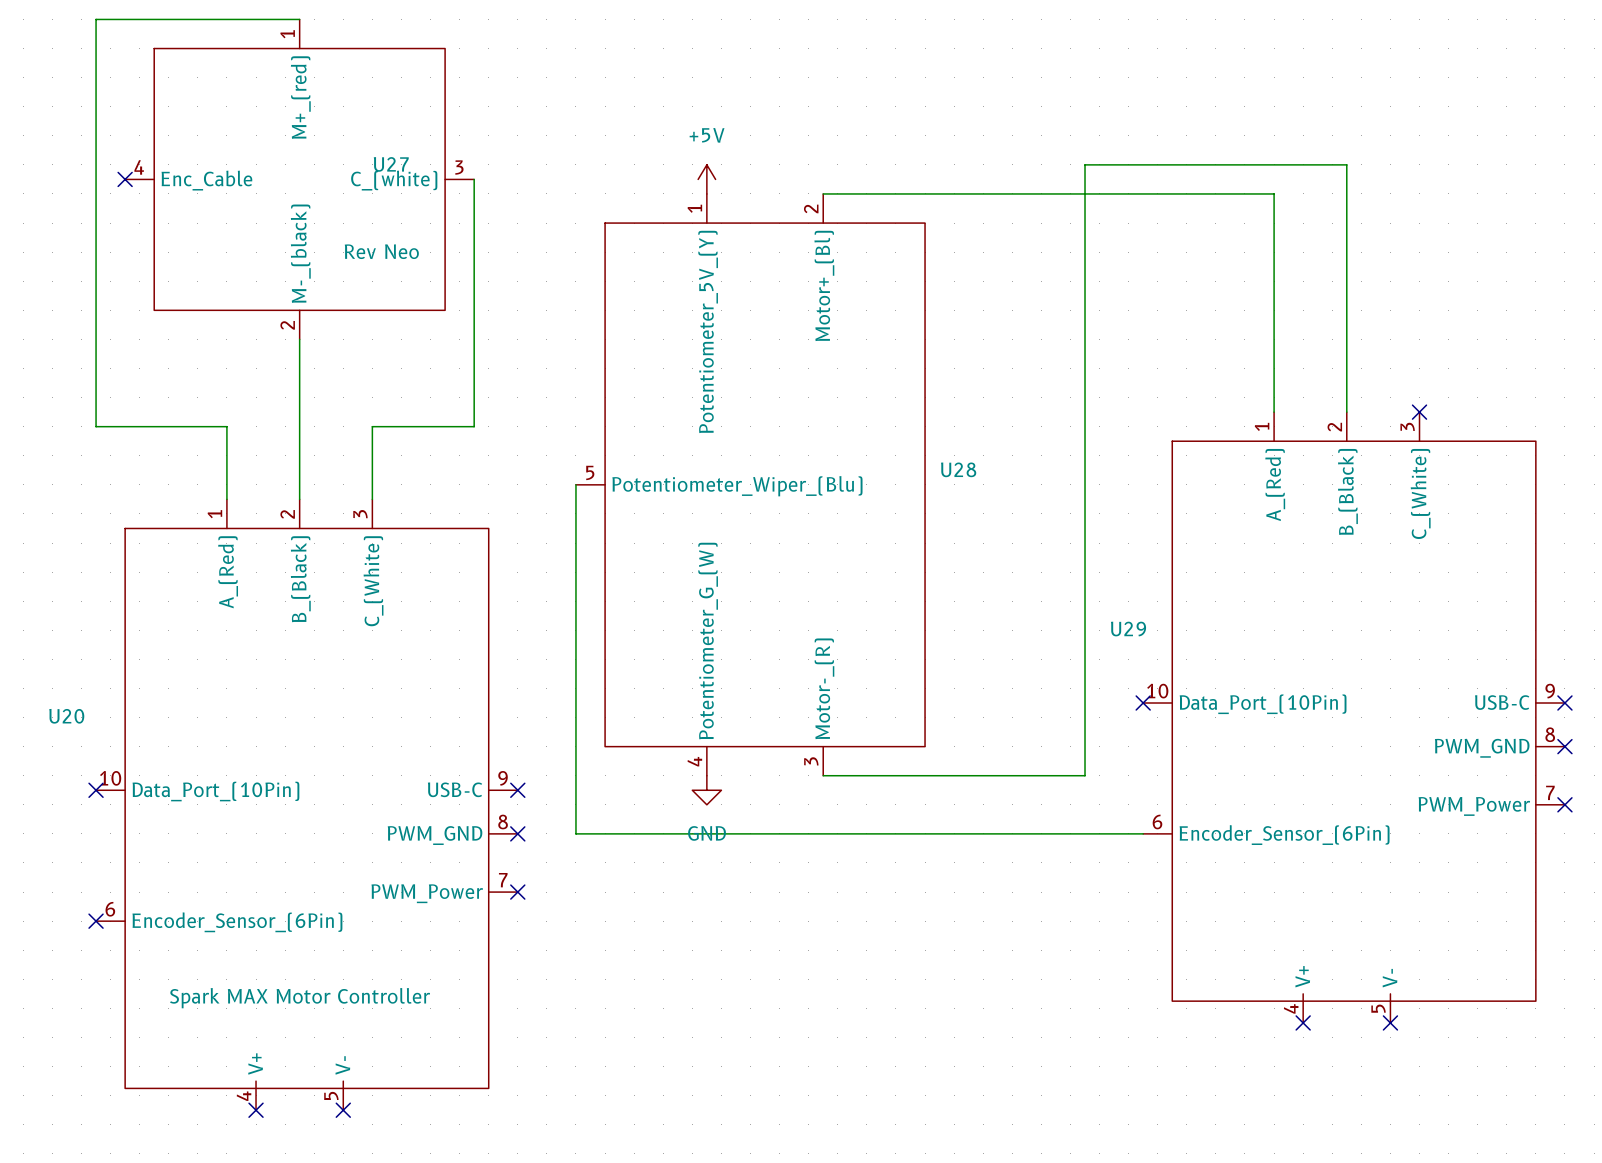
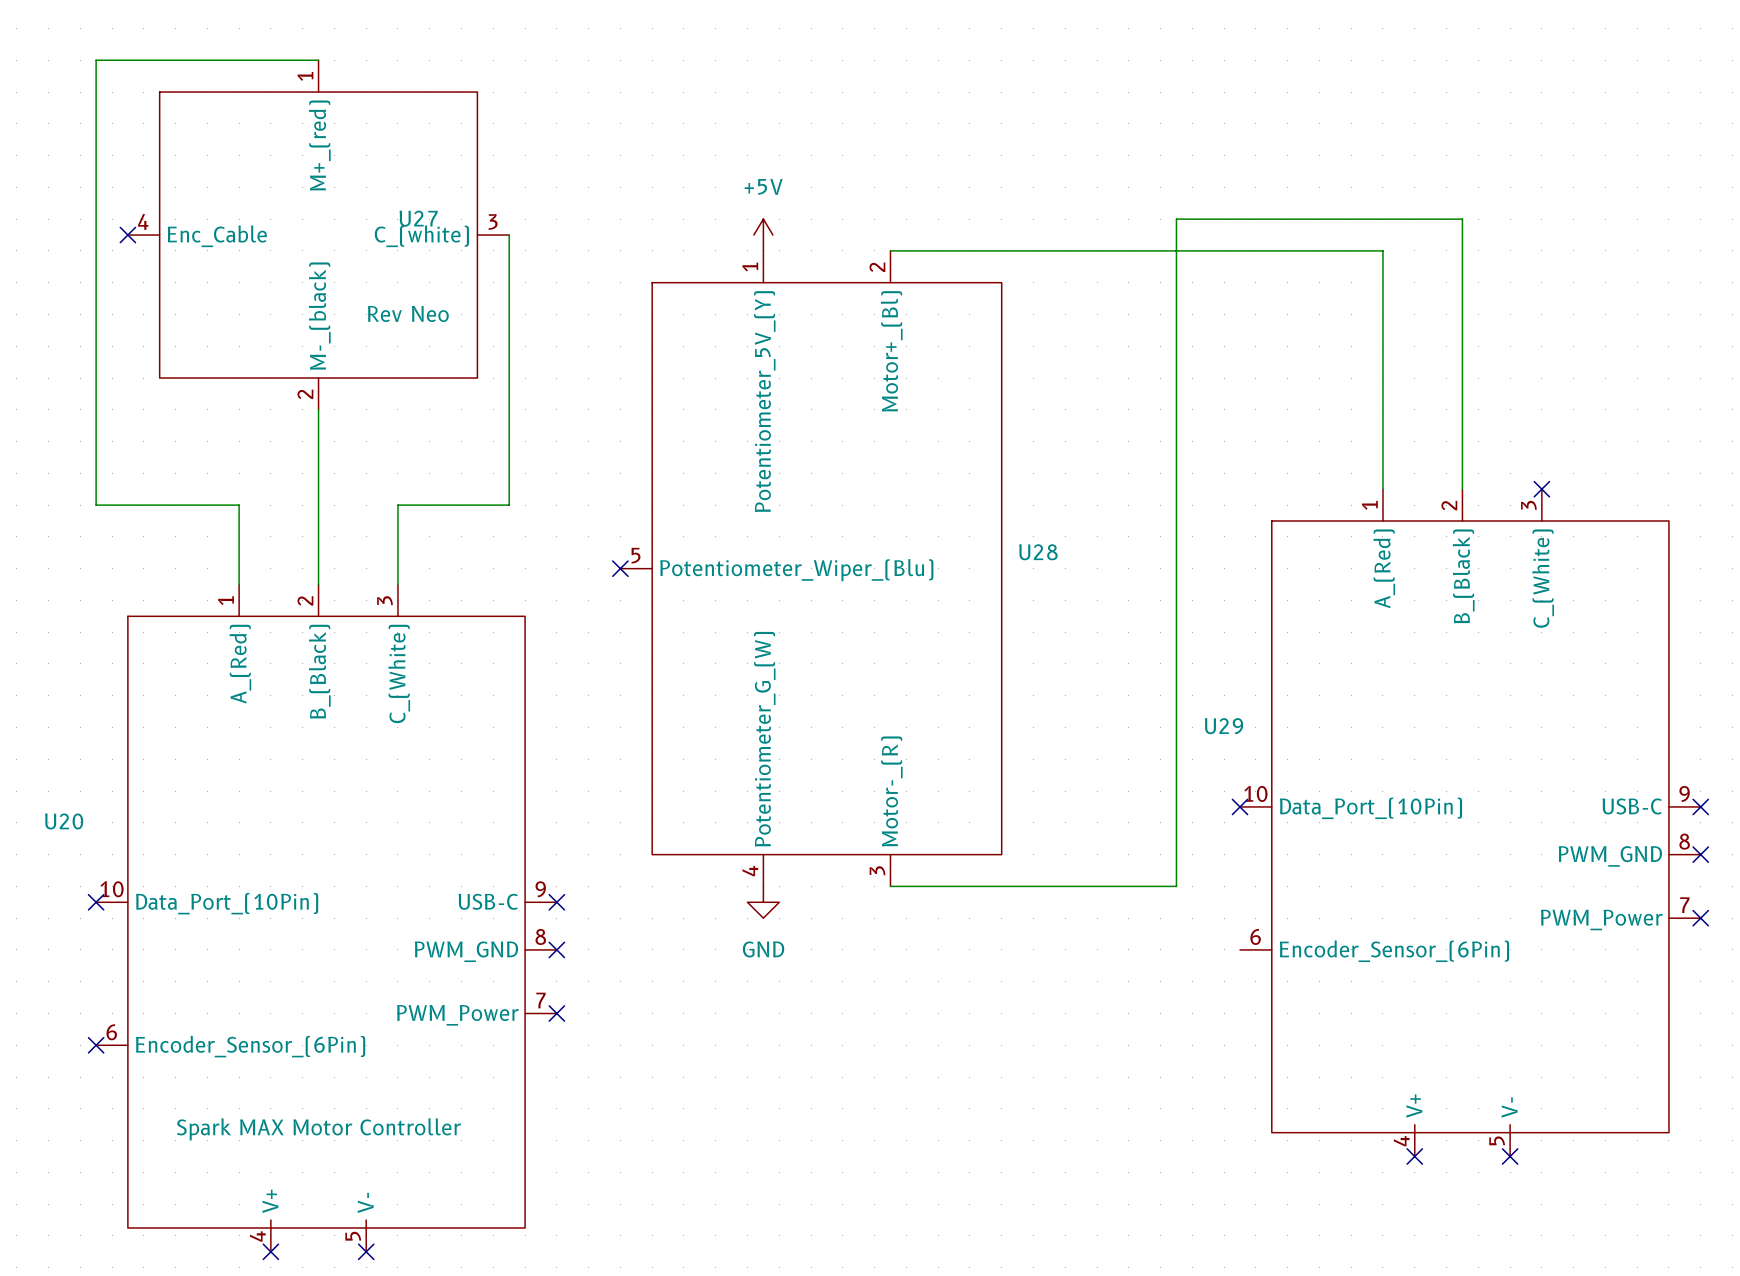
wire: (575, 484) (575, 833) (1143, 833) -> none
no-connect mark: none -> (620, 568)

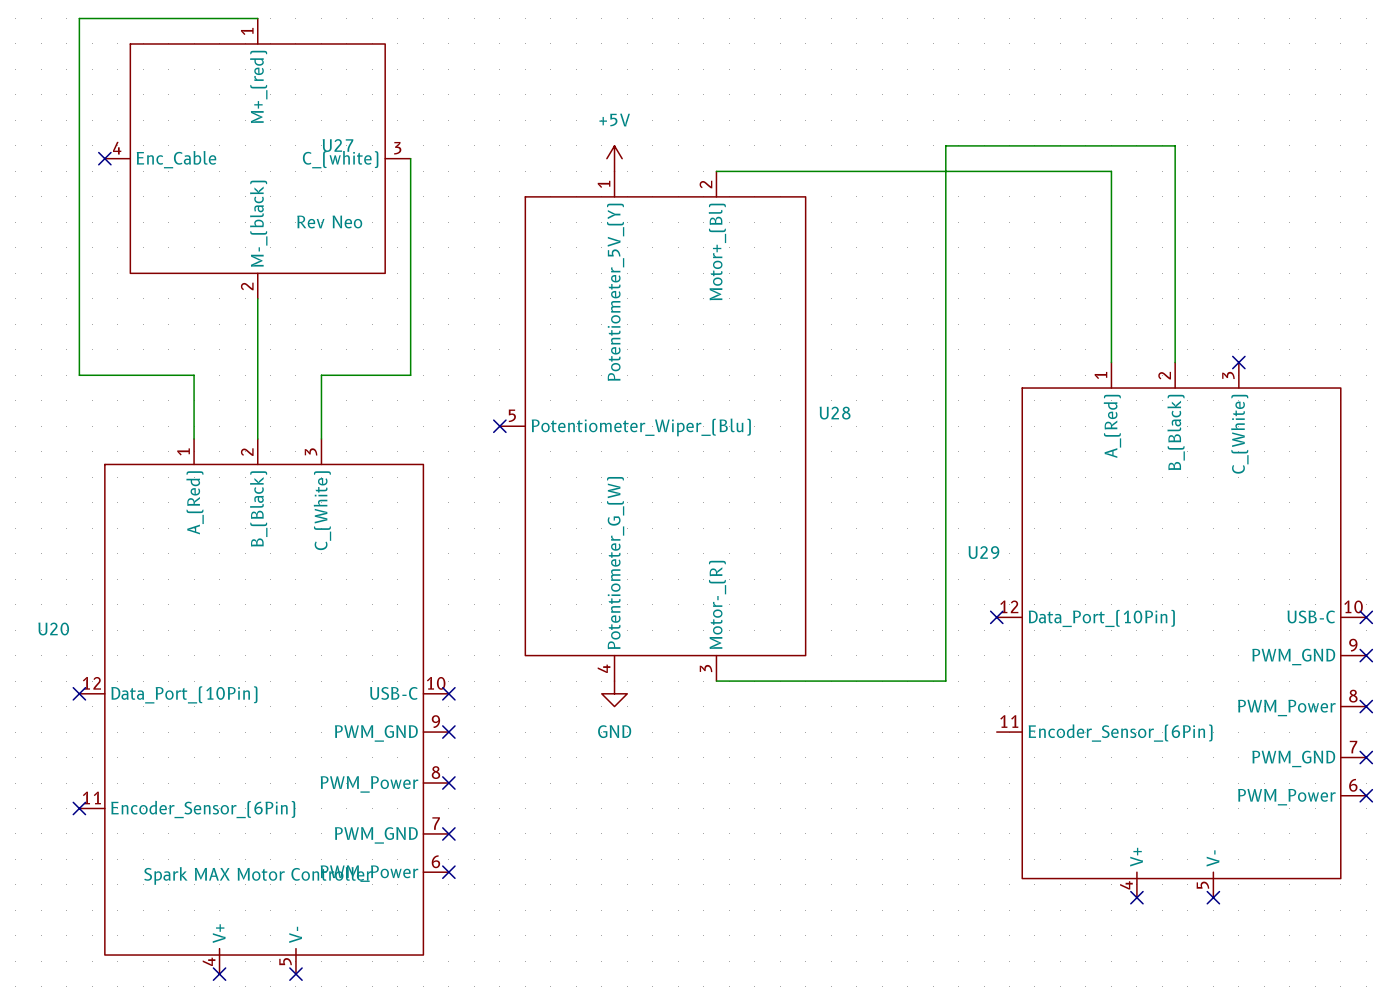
U29 symbol: [1240, 489, 1701, 1157] -> [996, 362, 1367, 898]
U20 symbol: [96, 584, 557, 1252] -> [79, 438, 449, 975]
no-connect mark: none -> (1366, 757)
no-connect mark: none -> (1366, 795)
no-connect mark: none -> (448, 833)
no-connect mark: none -> (448, 872)

